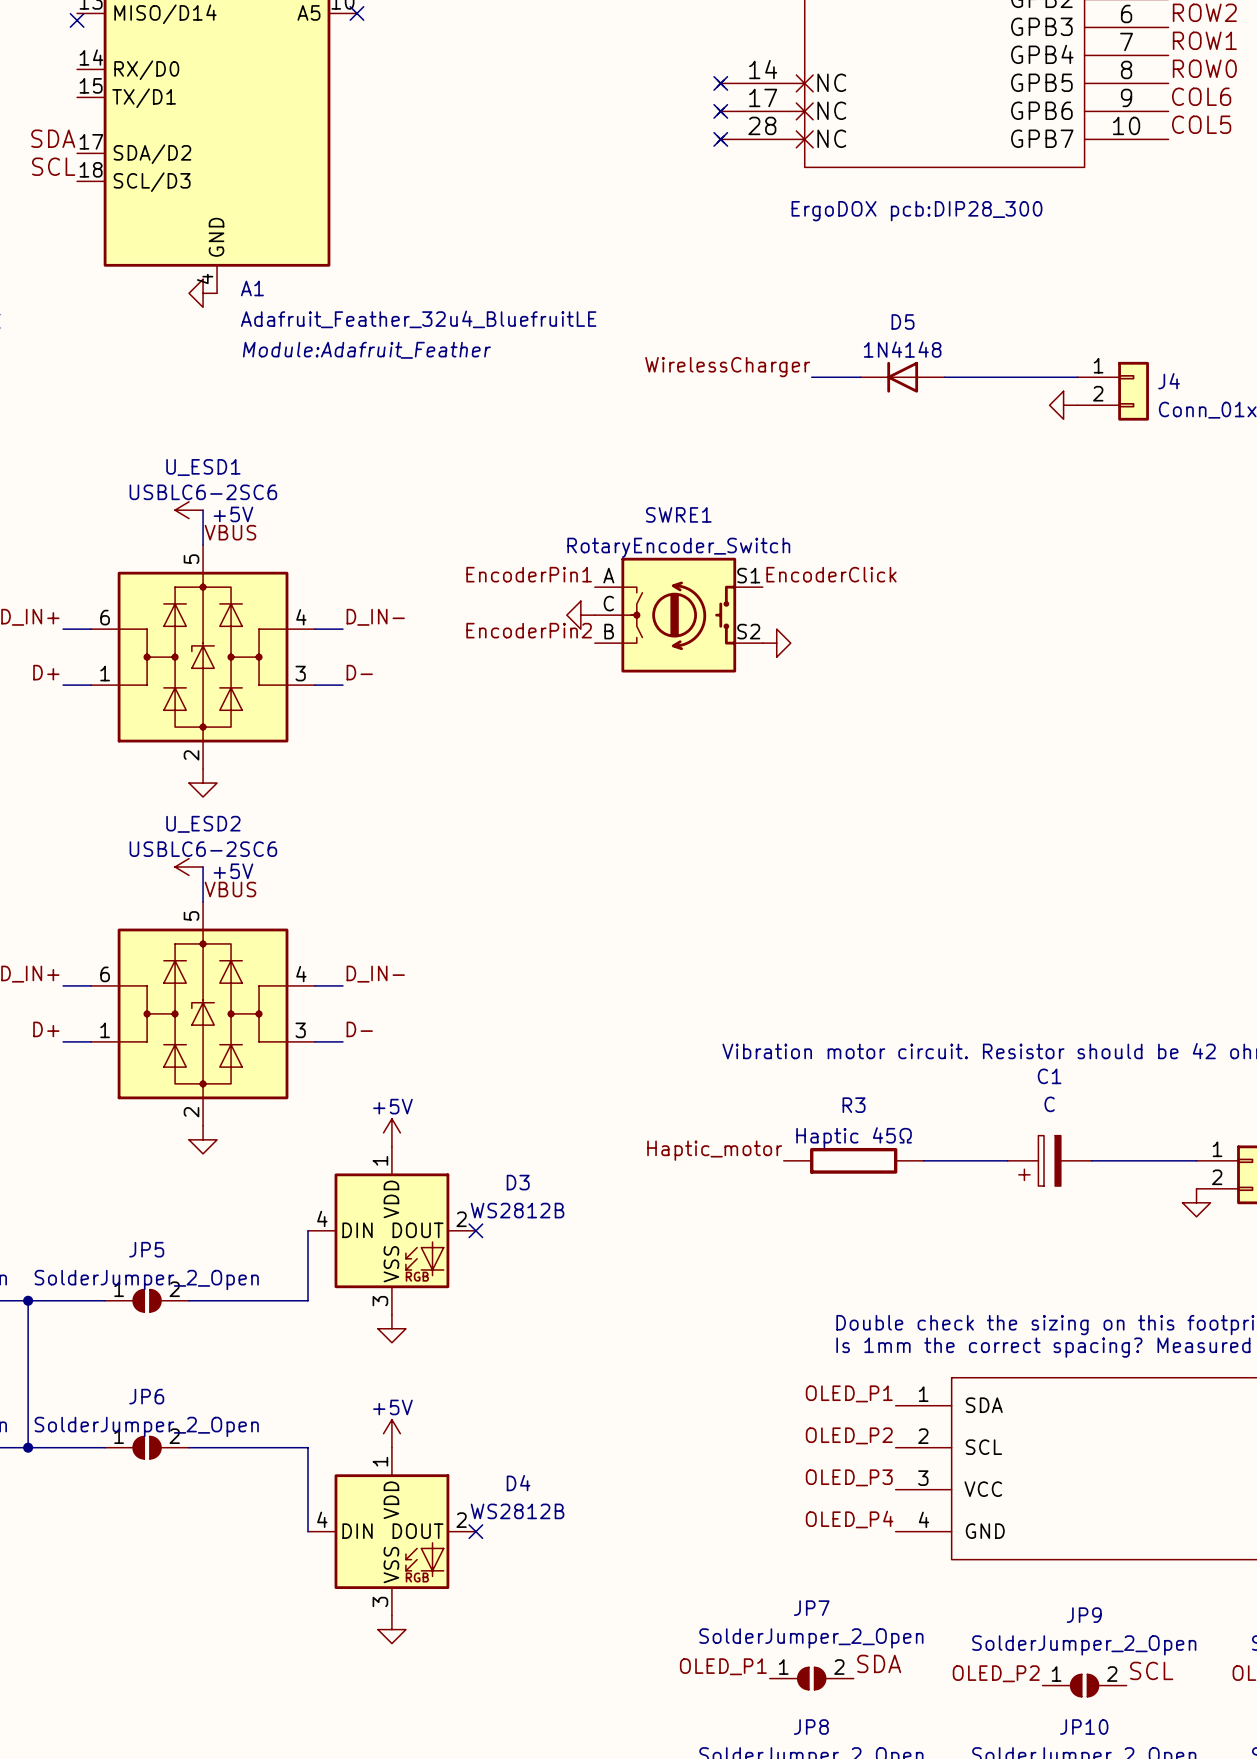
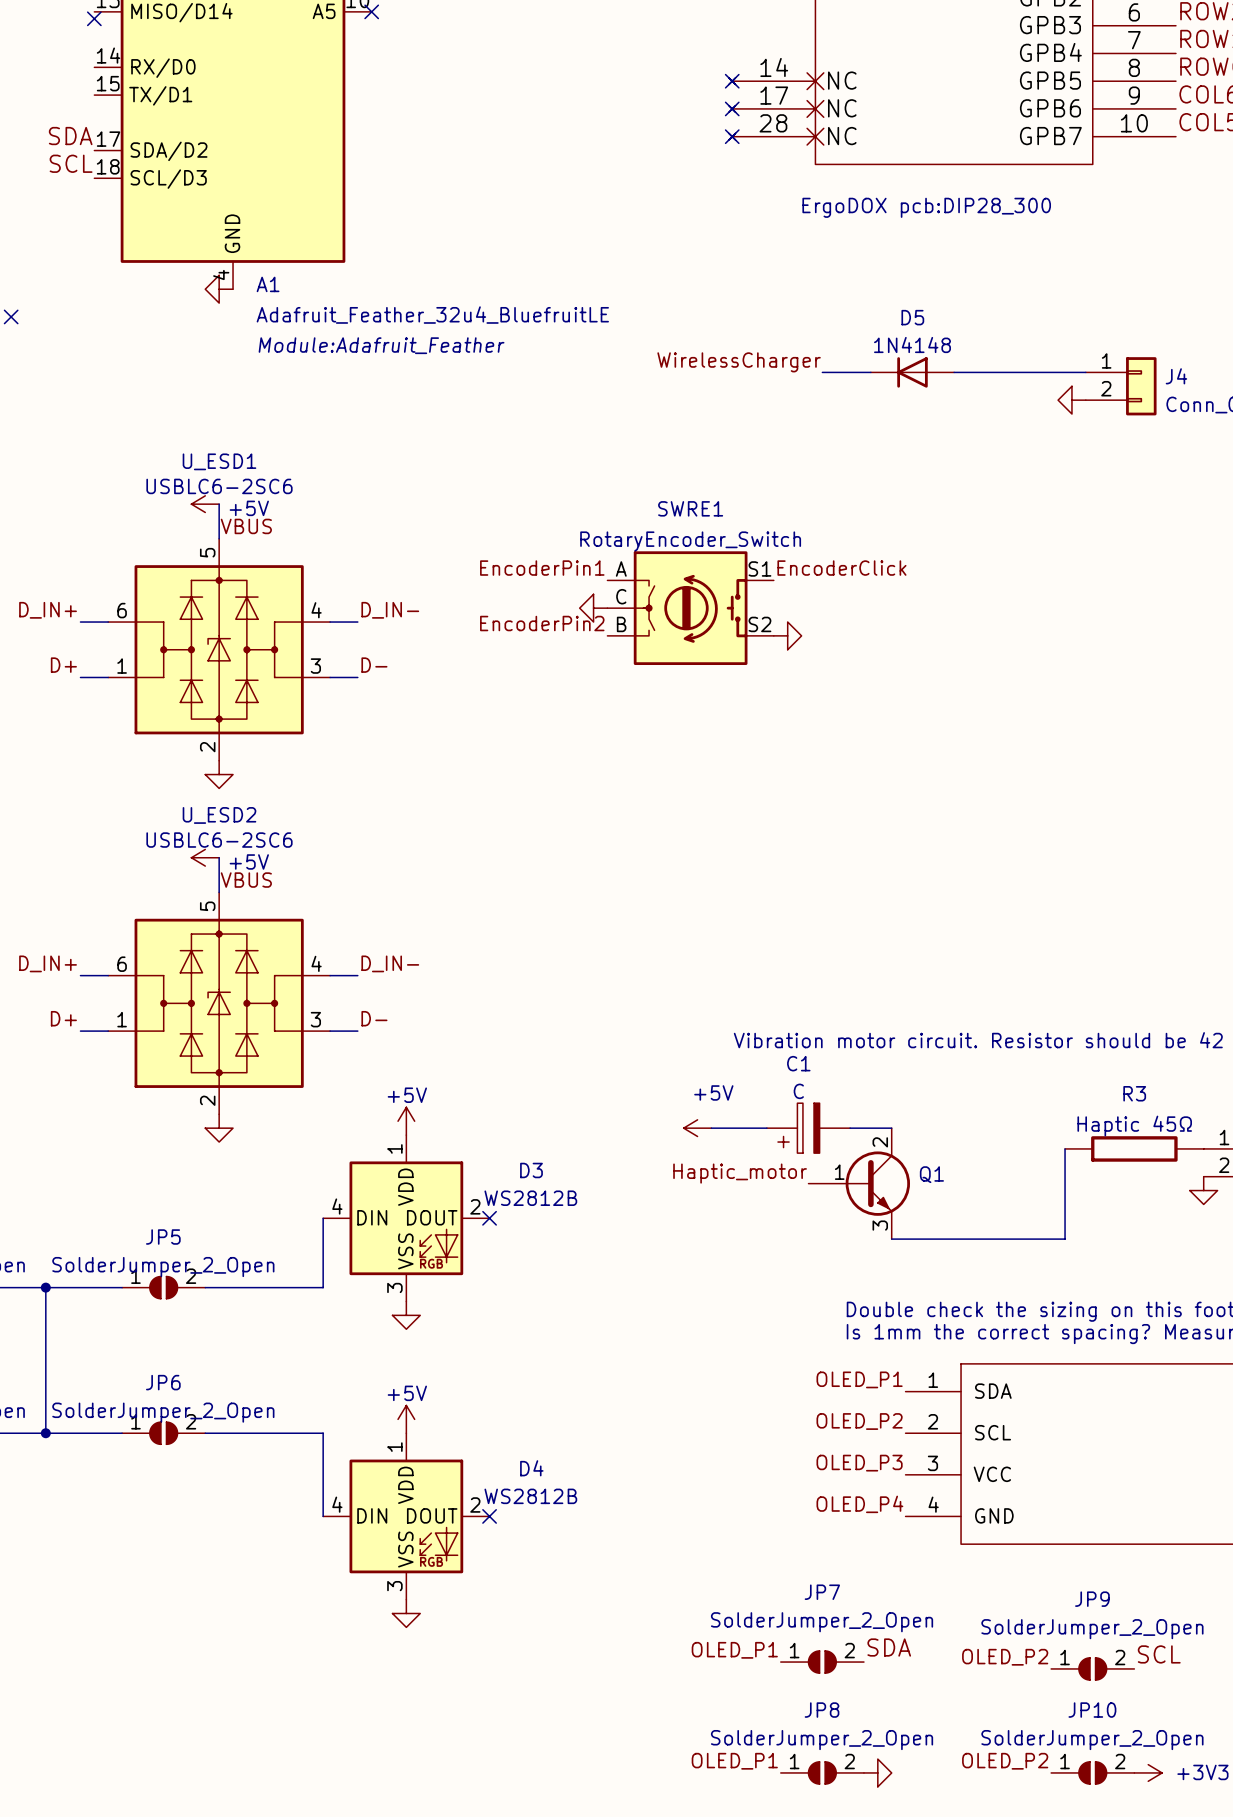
C1 name position: C1 (1049, 1076) -> C1 (798, 1063)
C1 value position: C (1049, 1104) -> C (798, 1091)
power symbol: none -> +5V (697, 1128)
wire: none -> (711, 1128) (766, 1128)
wire: none -> (850, 1128) (891, 1128)
label position: Haptic_motor (714, 1150) -> Haptic_motor (740, 1173)
R3 position: (853, 1160) -> (1134, 1148)
wire: (923, 1160) (1007, 1160) -> none
C1 position: (1049, 1160) -> (808, 1128)
wire: none -> (1065, 1148) (1065, 1239) (891, 1239)
wire: (1091, 1160) (1196, 1160) -> none
Q1: none -> (859, 1183)

